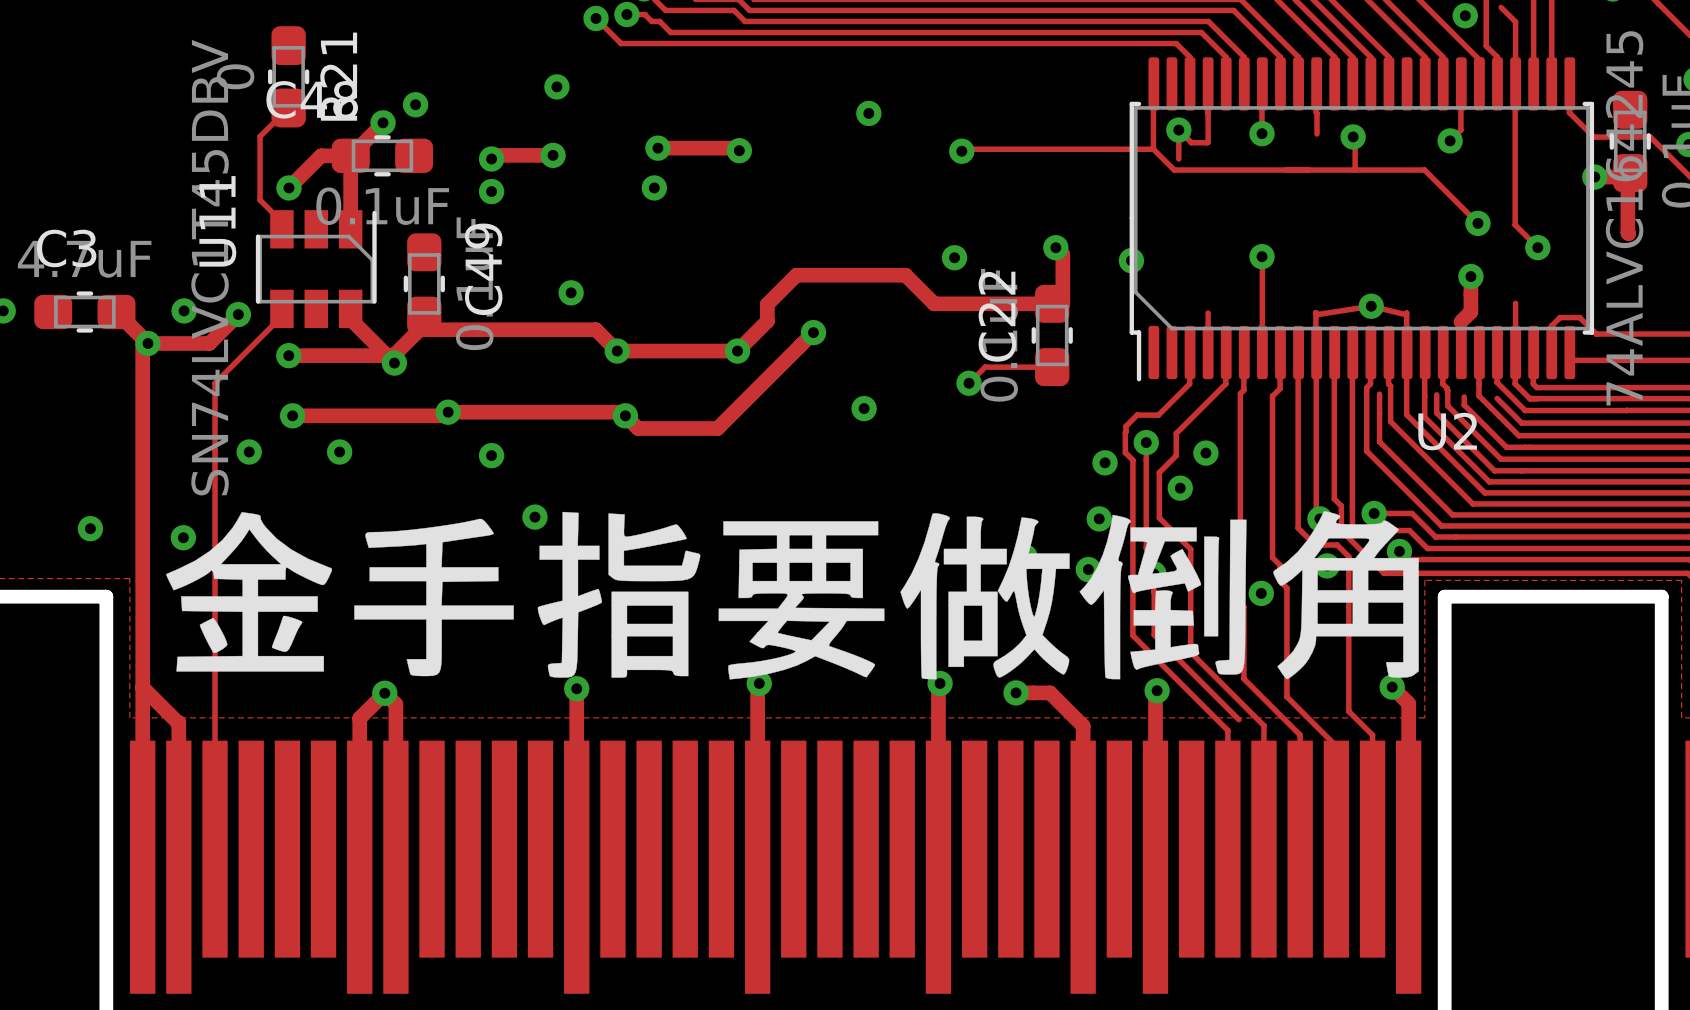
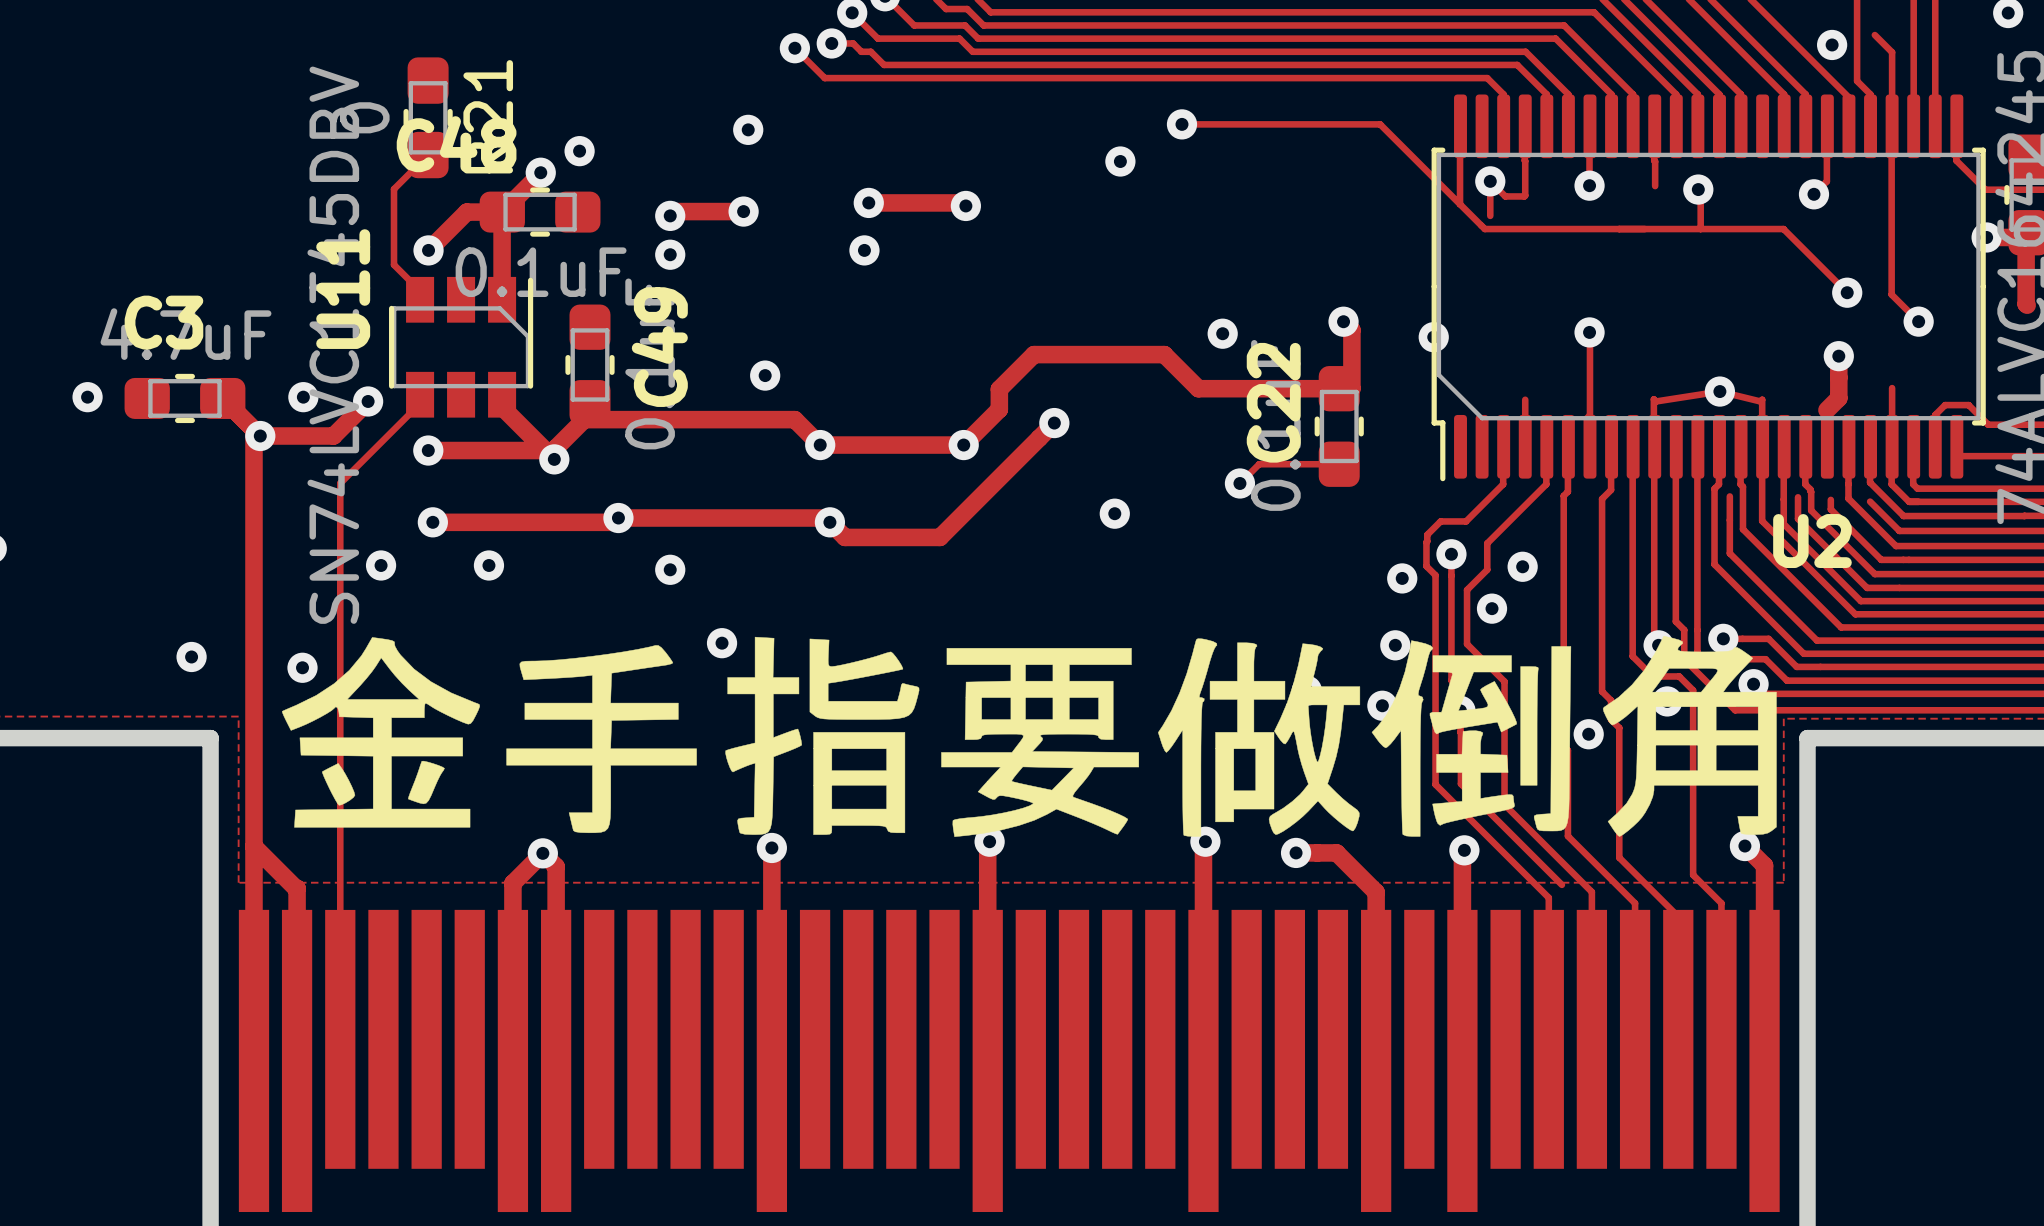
track: (1153, 149) (963, 149) (961, 151) -> (1460, 204) (1380, 124) (1181, 124)
via position: (961, 151) -> (1181, 124)

